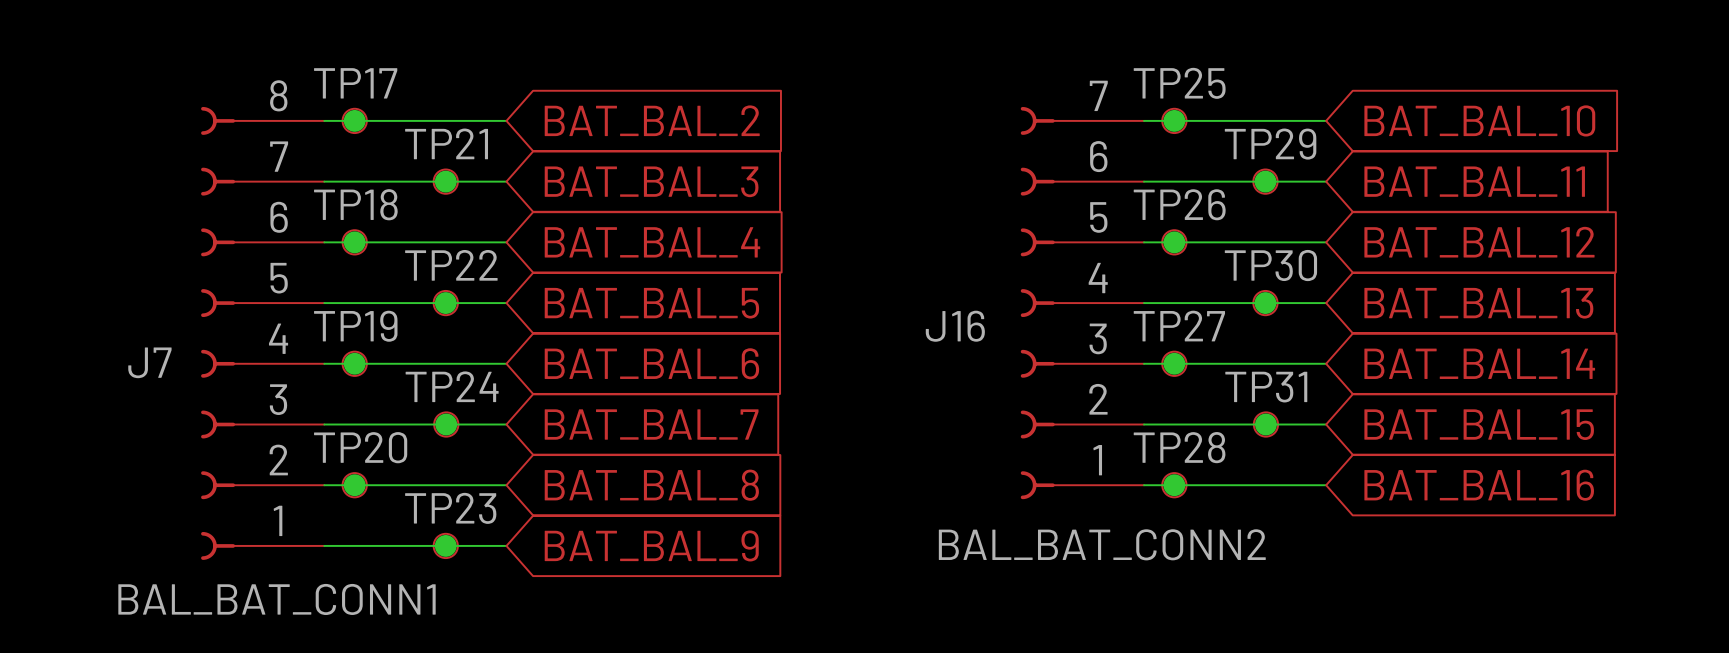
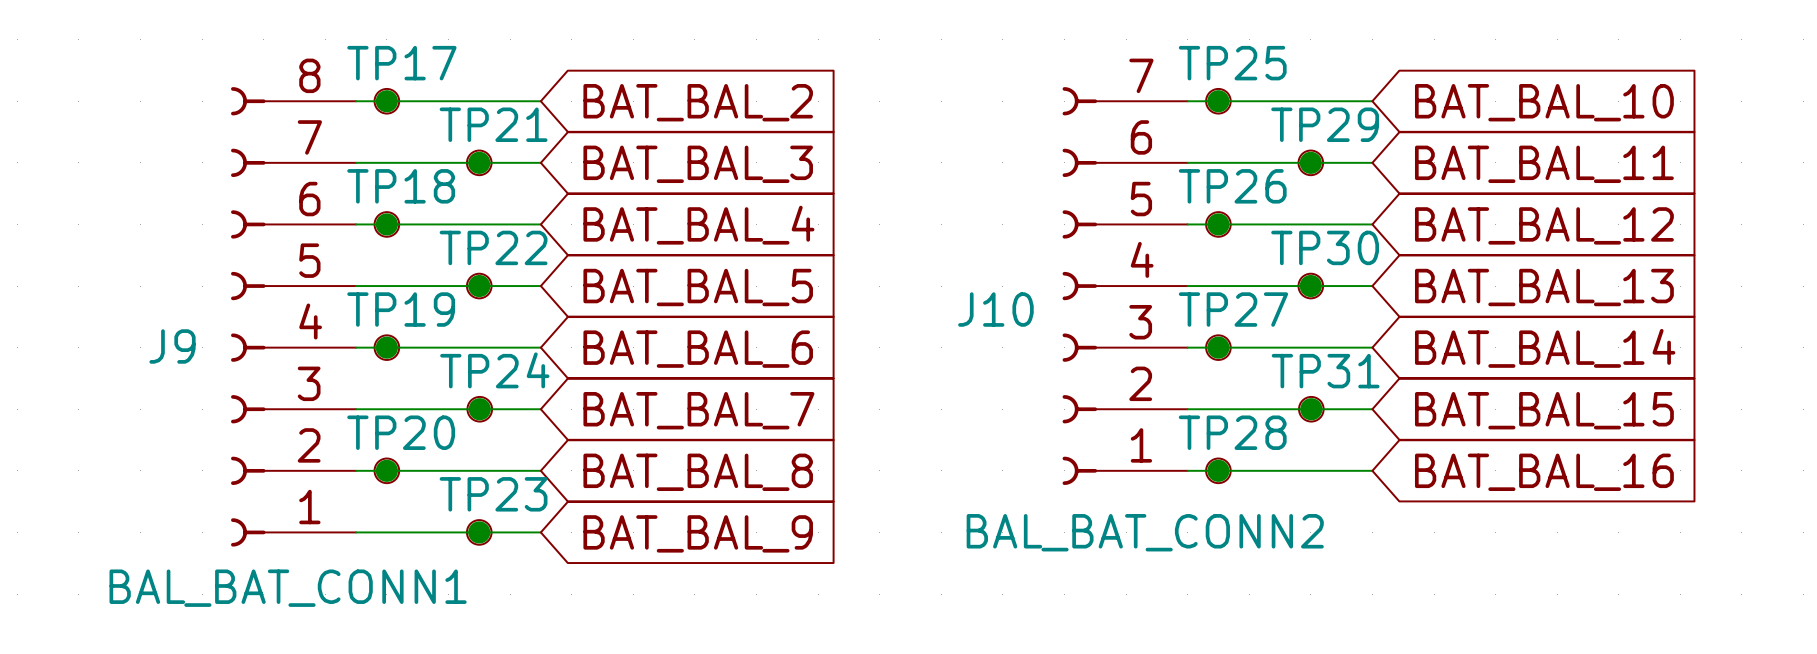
J16 name: J16 (955, 326) -> J10 (995, 309)
J7 name: J7 (149, 362) -> J9 (172, 346)

